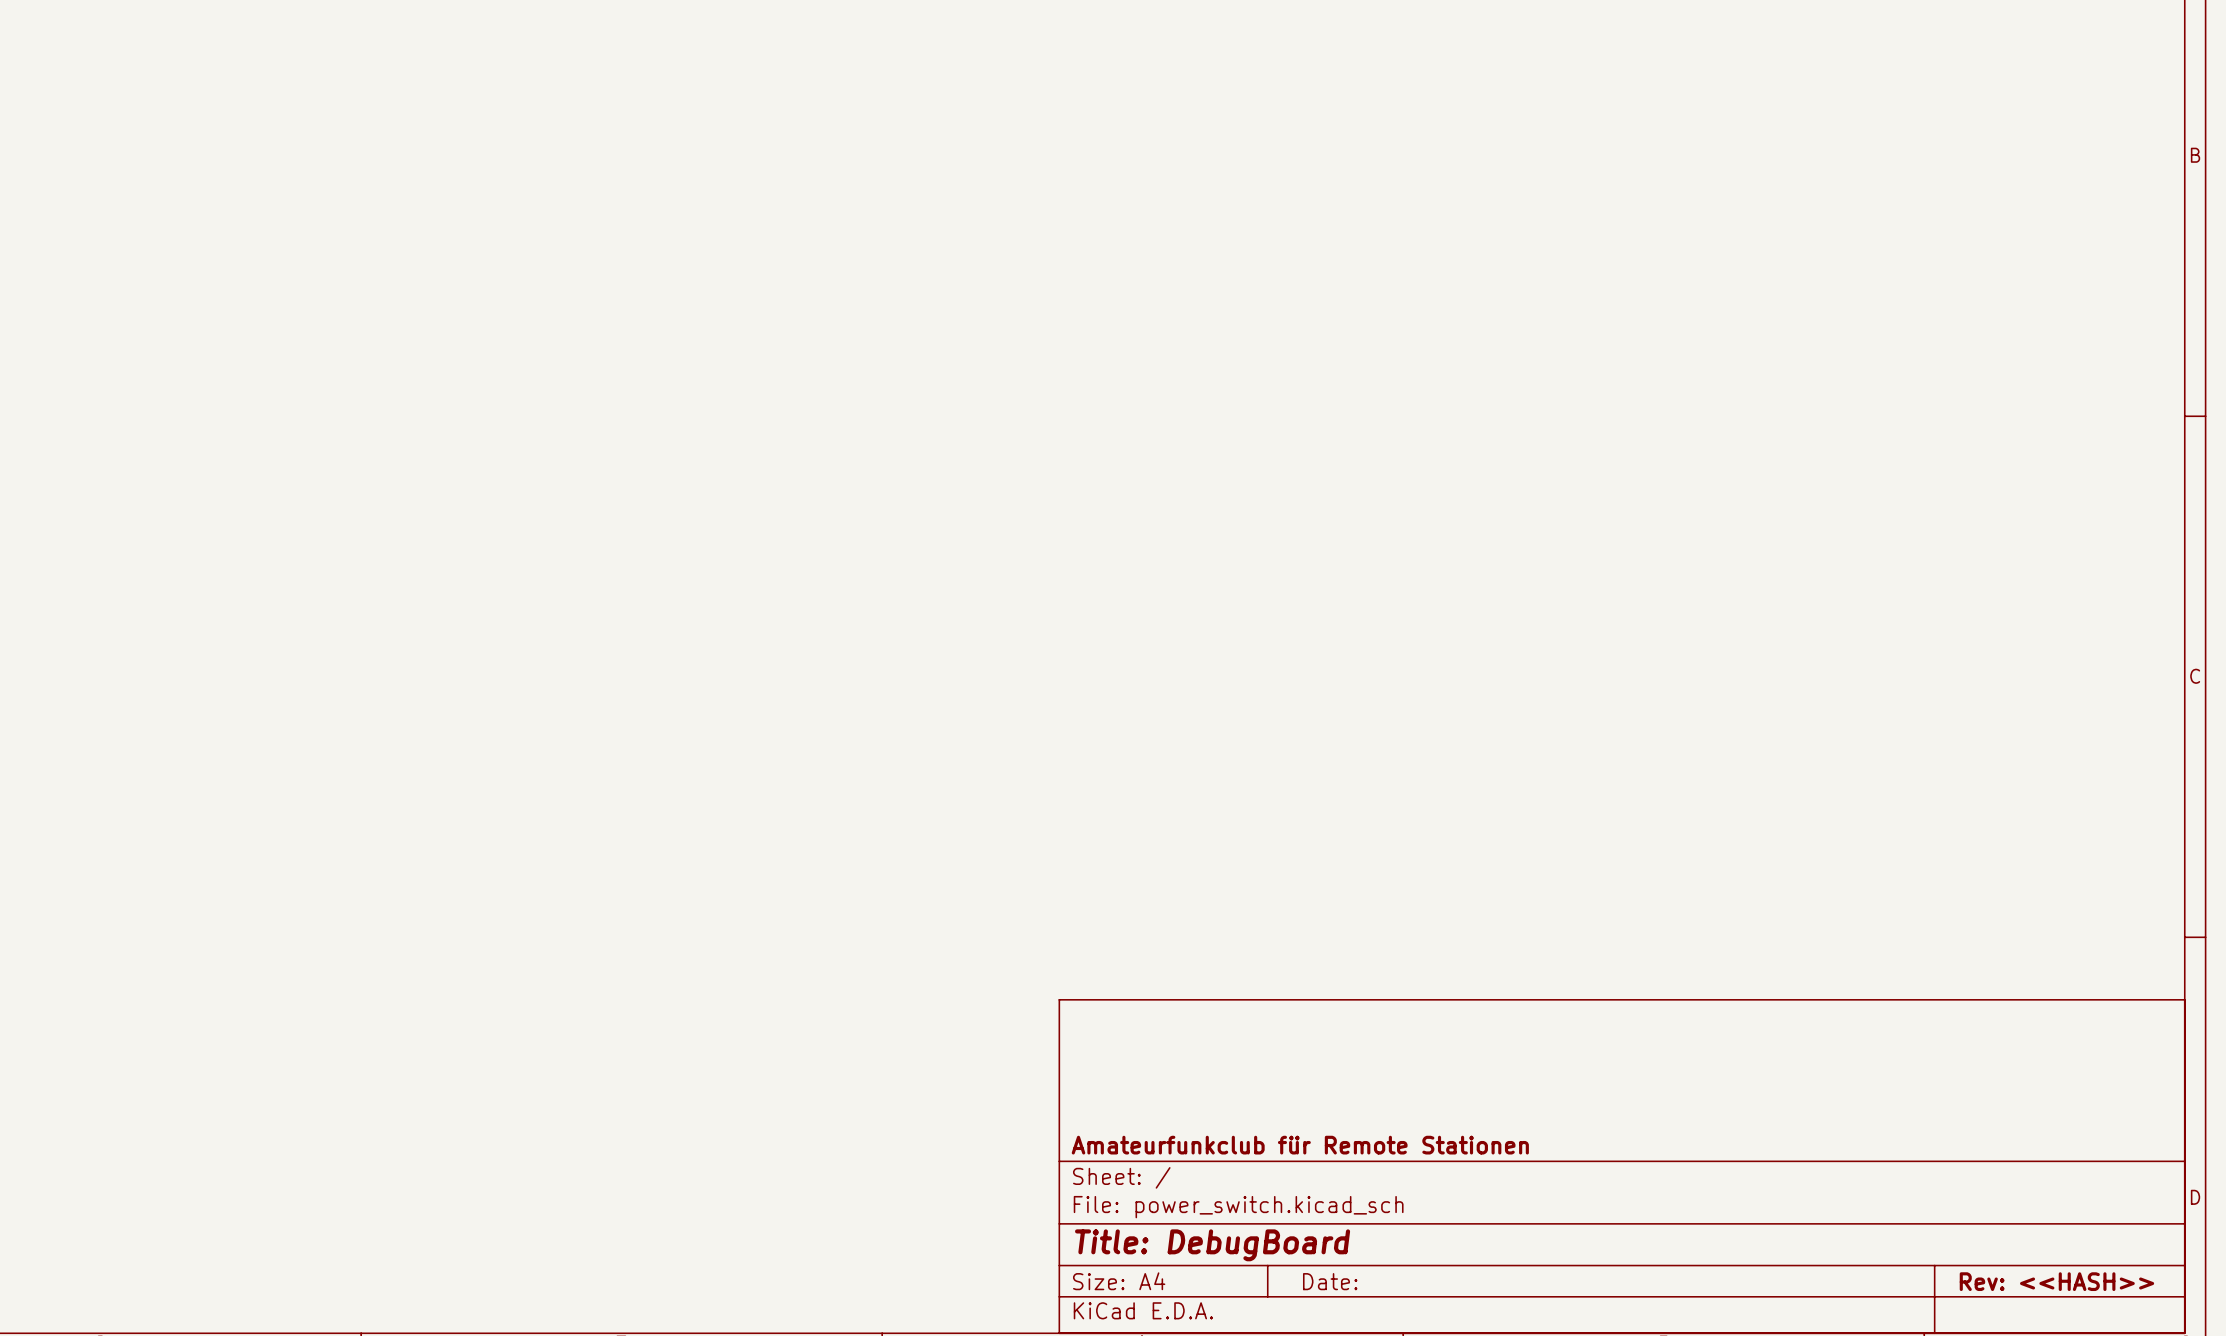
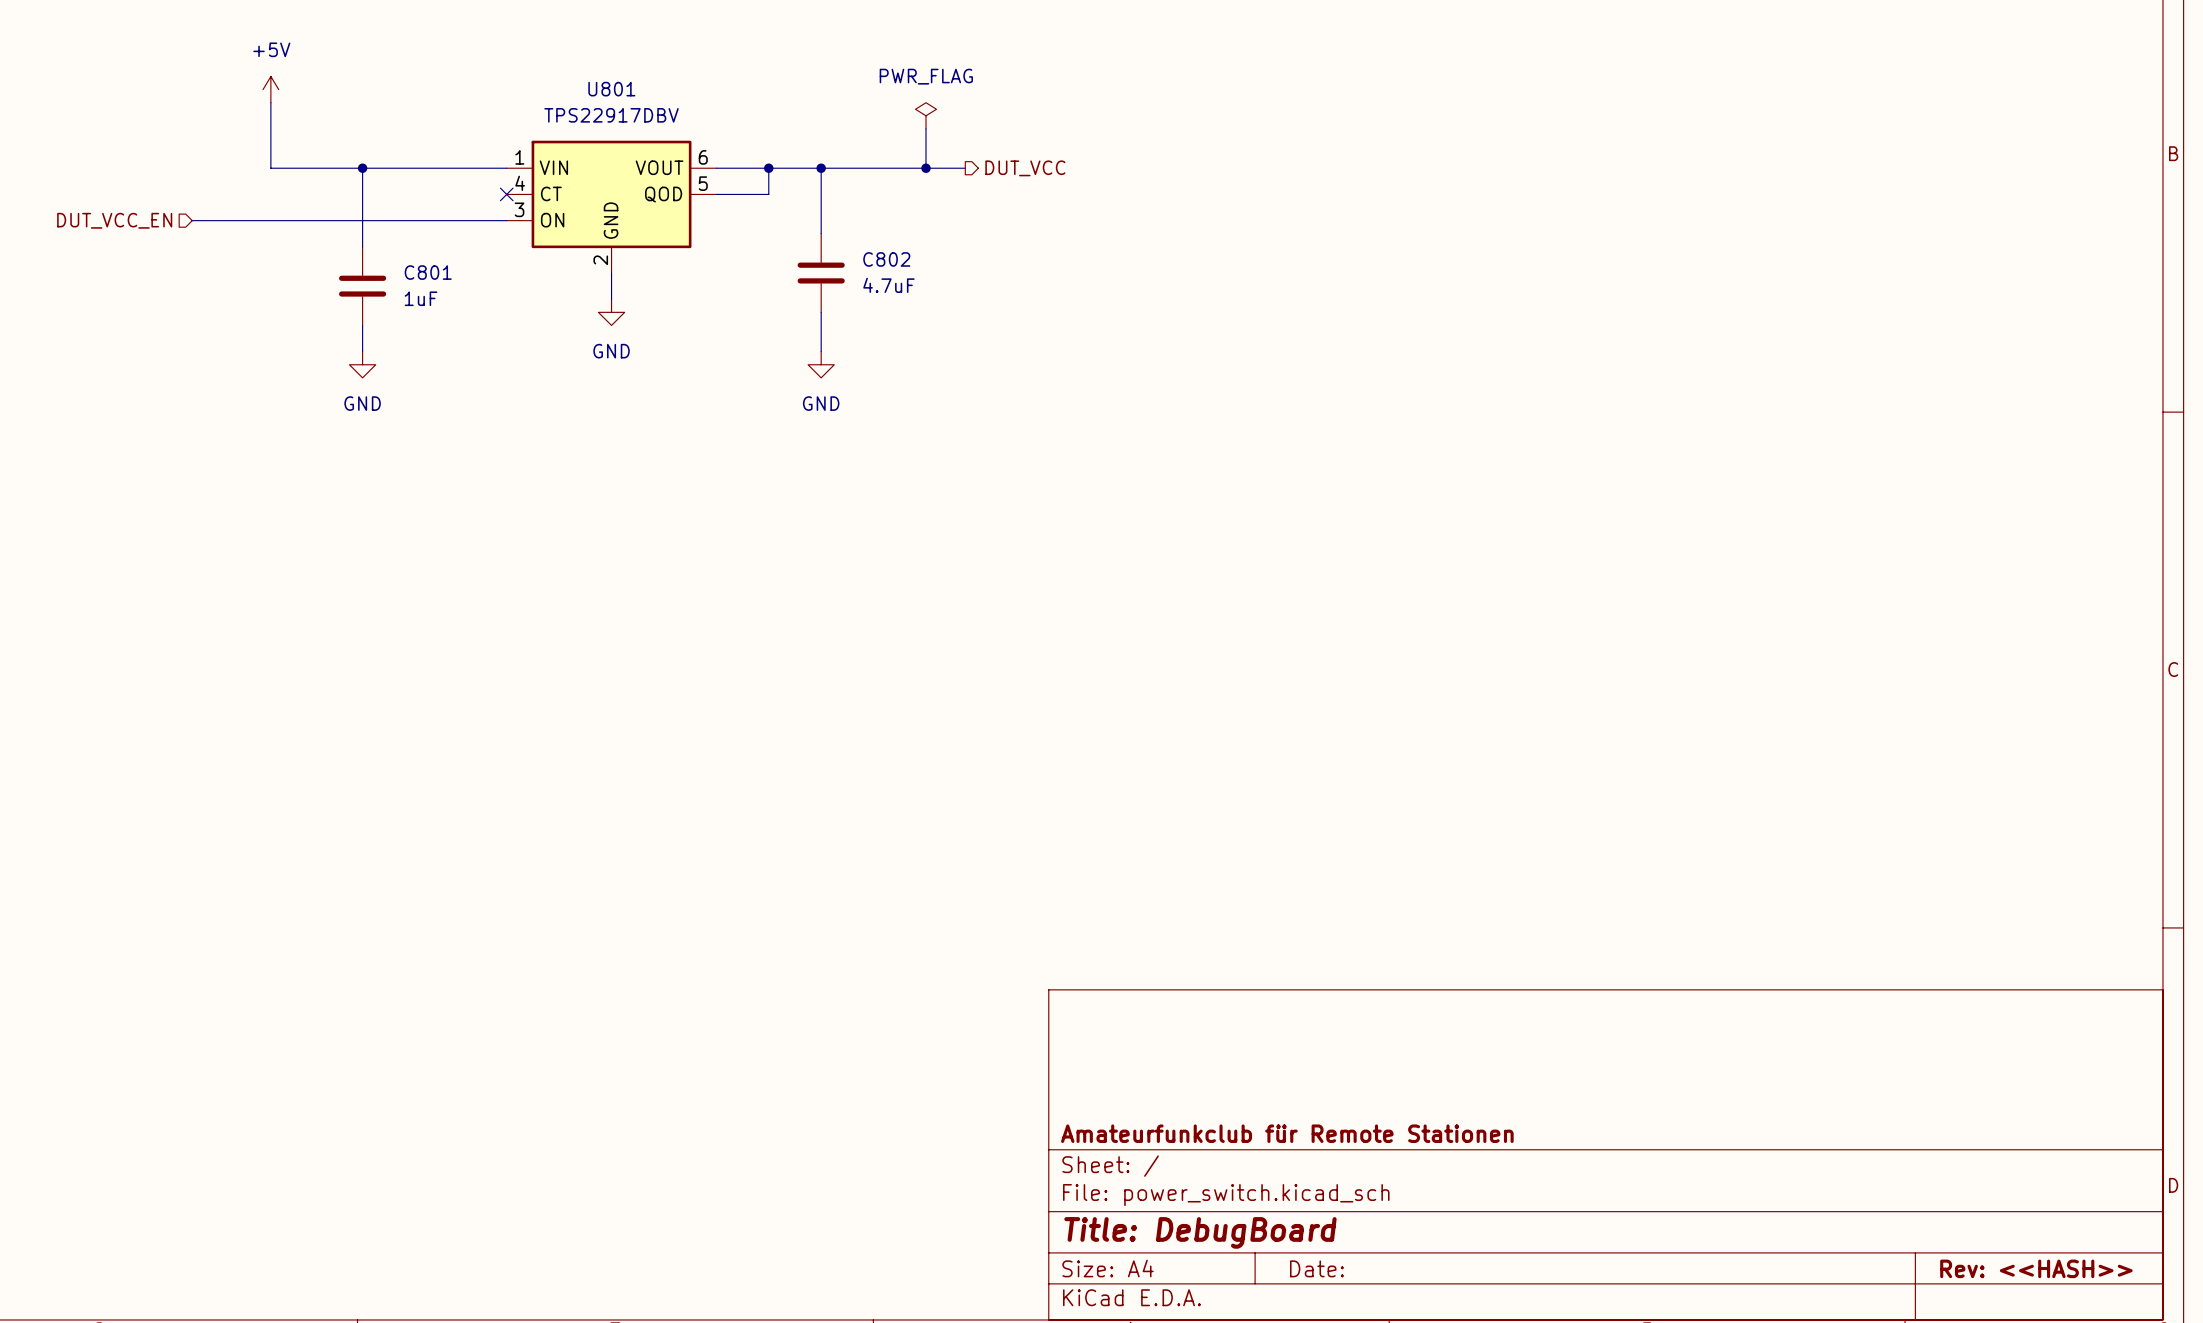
power symbol: none -> +5V (270, 89)
wire: none -> (270, 102) (270, 168) (506, 168)
power symbol: none -> PWR_FLAG (926, 115)
wire: none -> (926, 128) (926, 168)
wire: none -> (362, 168) (362, 246)
junction: none -> (362, 168)
wire: none -> (716, 168) (965, 168)
wire: none -> (768, 168) (768, 194) (716, 194)
junction: none -> (768, 168)
wire: none -> (821, 168) (821, 233)
junction: none -> (821, 168)
junction: none -> (926, 168)
hierarchical label: none -> DUT_VCC (1025, 168)
no-connect mark: none -> (506, 194)
U801: none -> TPS22917DBV (611, 206)
hierarchical label: none -> DUT_VCC_EN (114, 220)
wire: none -> (192, 220) (506, 220)
wire: none -> (611, 273) (611, 299)
C802: none -> 4.7uF (821, 273)
C801: none -> 1uF (362, 286)
power symbol: none -> GND (611, 312)
wire: none -> (821, 312) (821, 351)
wire: none -> (362, 325) (362, 351)
power symbol: none -> GND (362, 364)
power symbol: none -> GND (821, 364)

